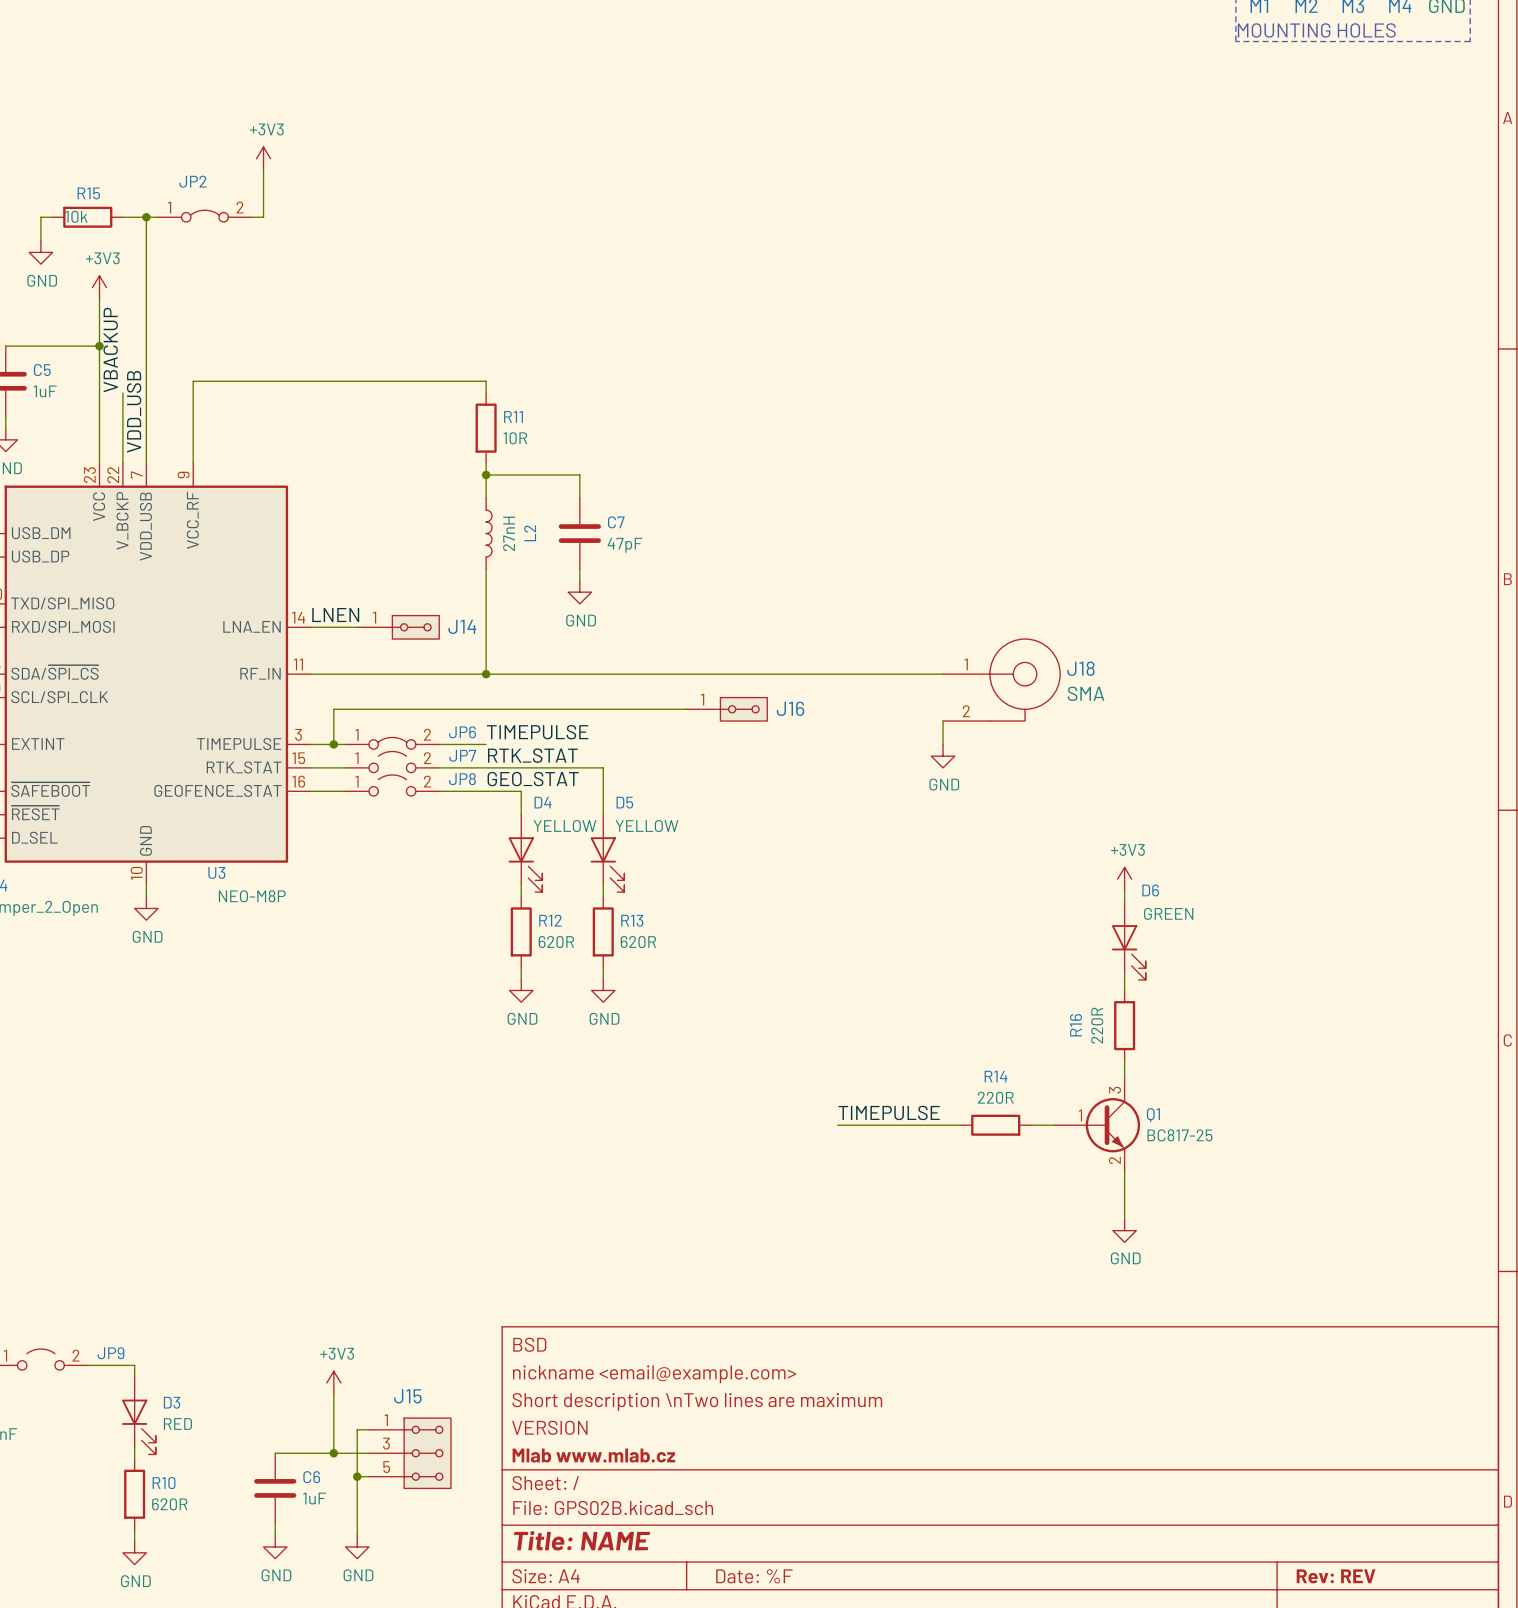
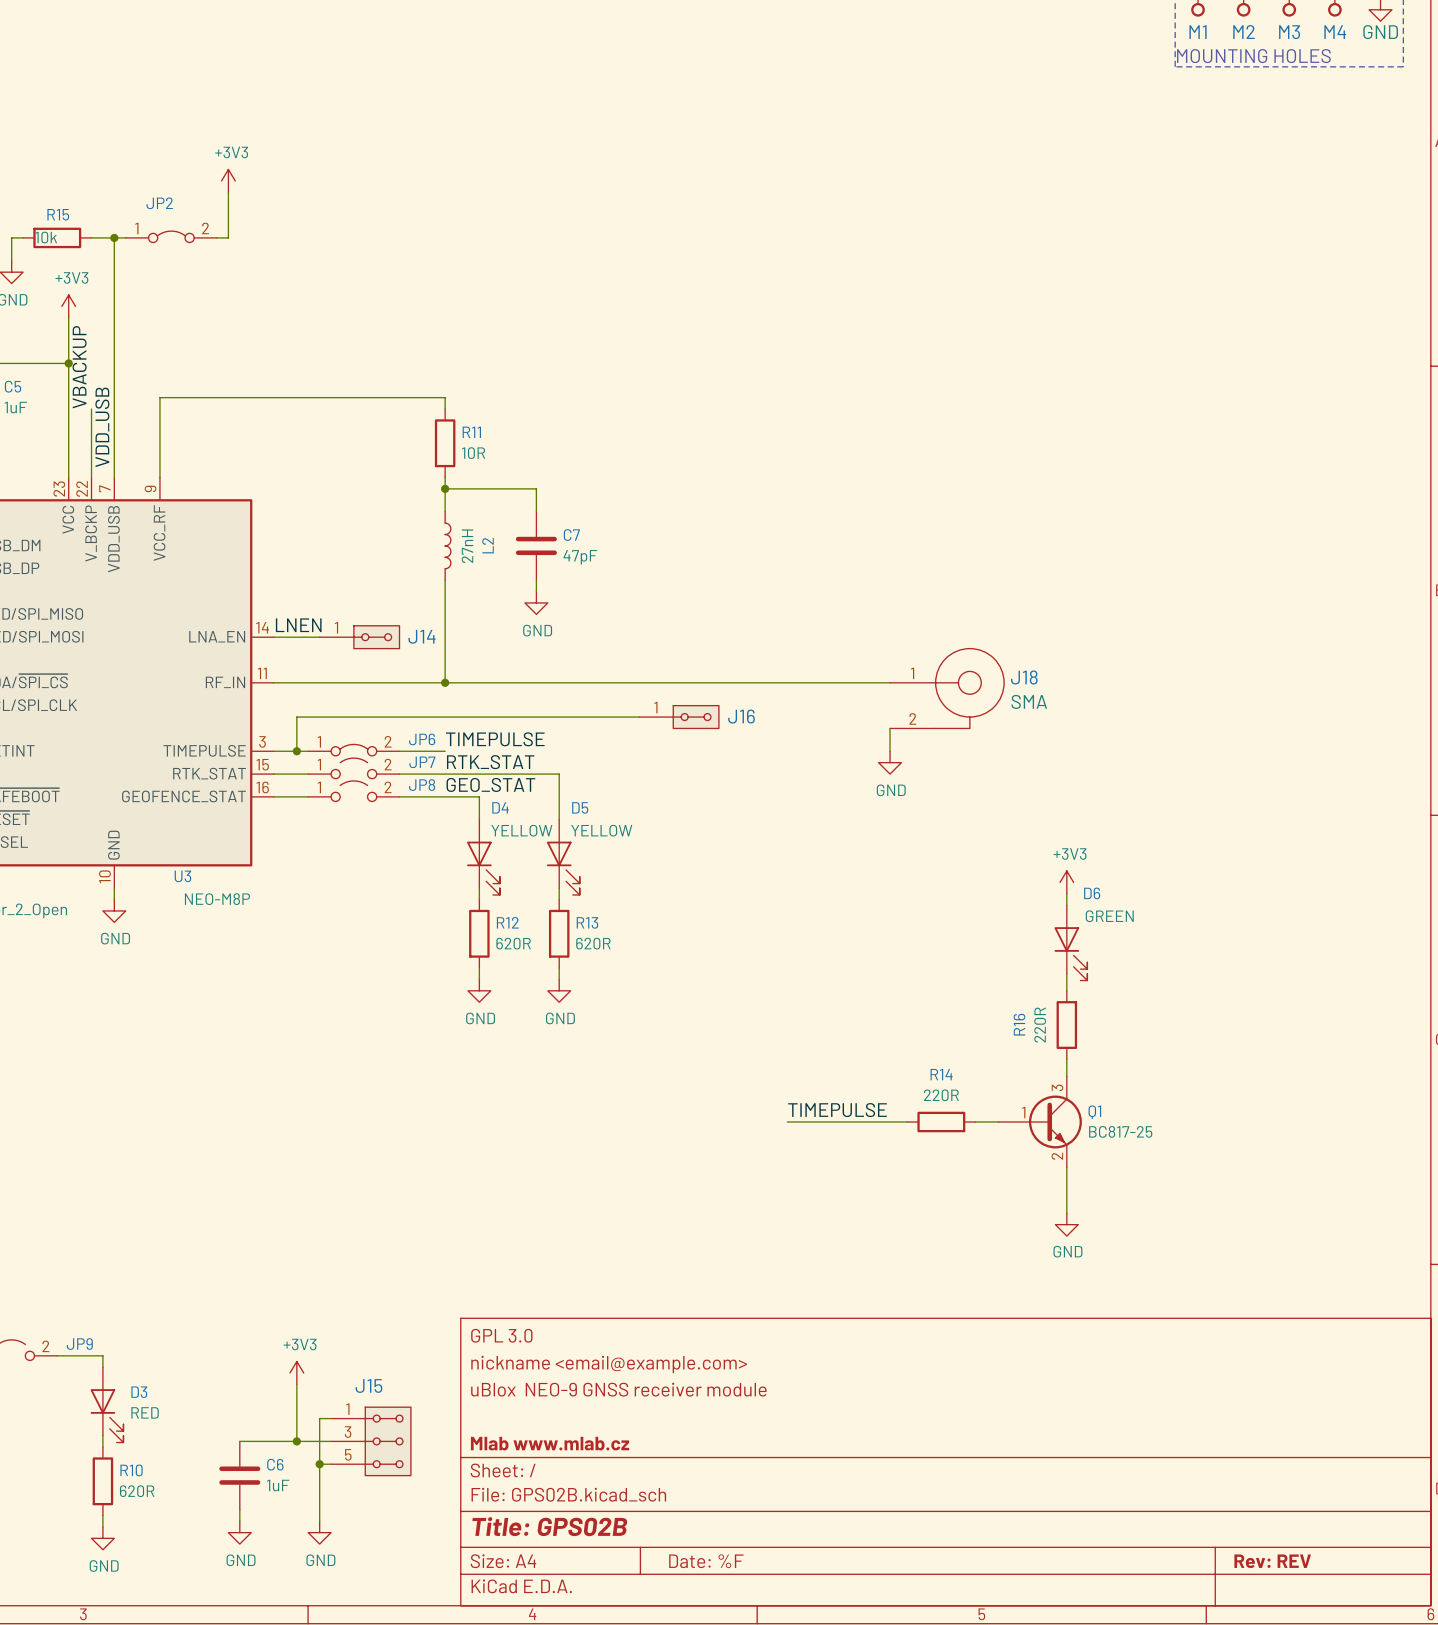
title block: BSD (529, 1344) -> GPL 3.0 (501, 1335)
title block: Short description \nTwo lines are maximum (697, 1401) -> uBlox NEO-9 GNSS receiver module (618, 1389)
title block: VERSION (549, 1427) -> none
title block: Title: NAME (582, 1540) -> Title: GPS02B (550, 1526)

